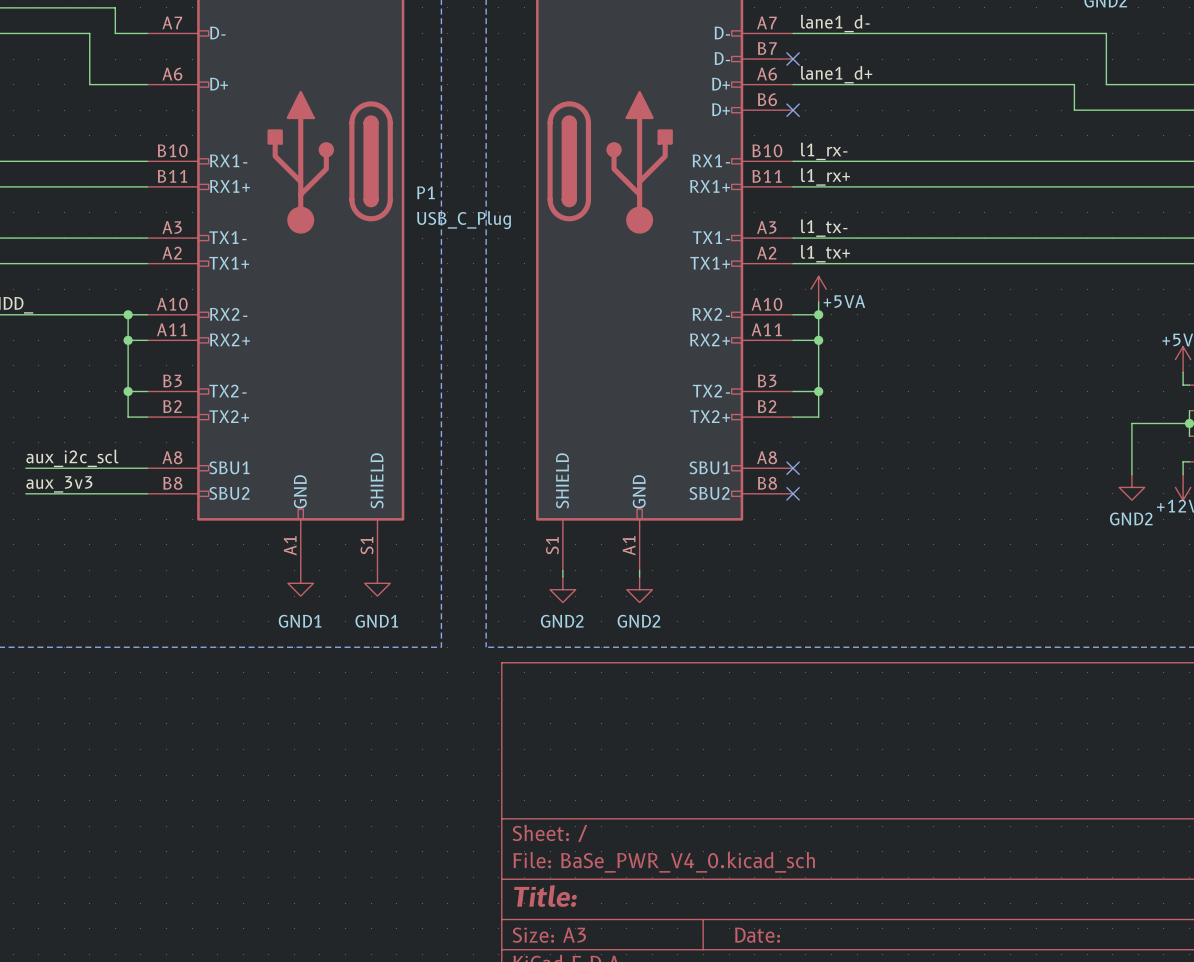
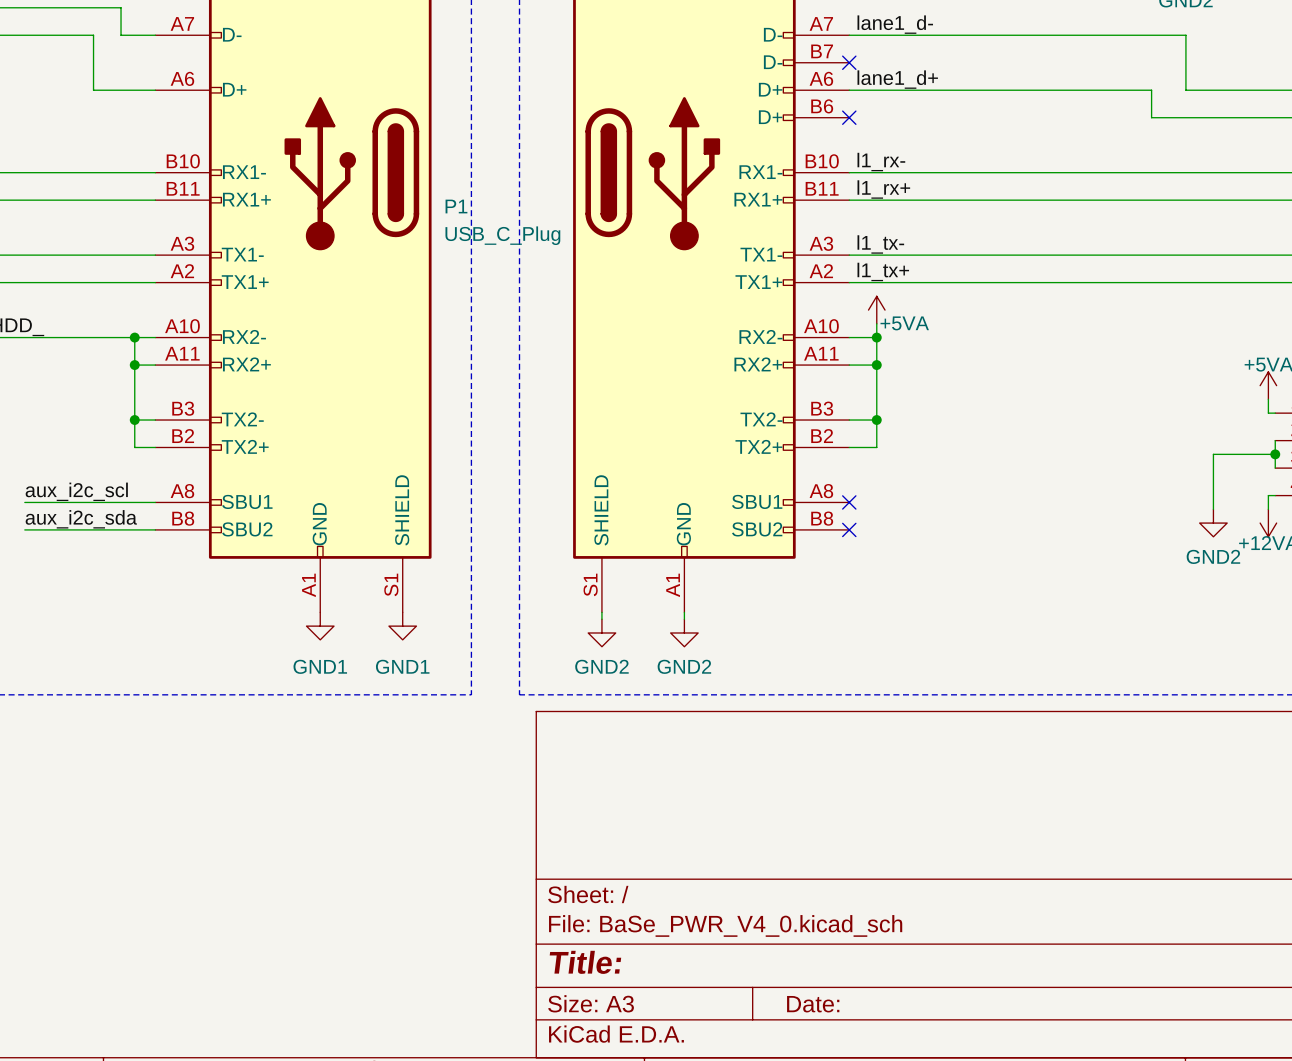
label: aux_3v3 (59, 484) -> aux_i2c_sda (81, 519)

